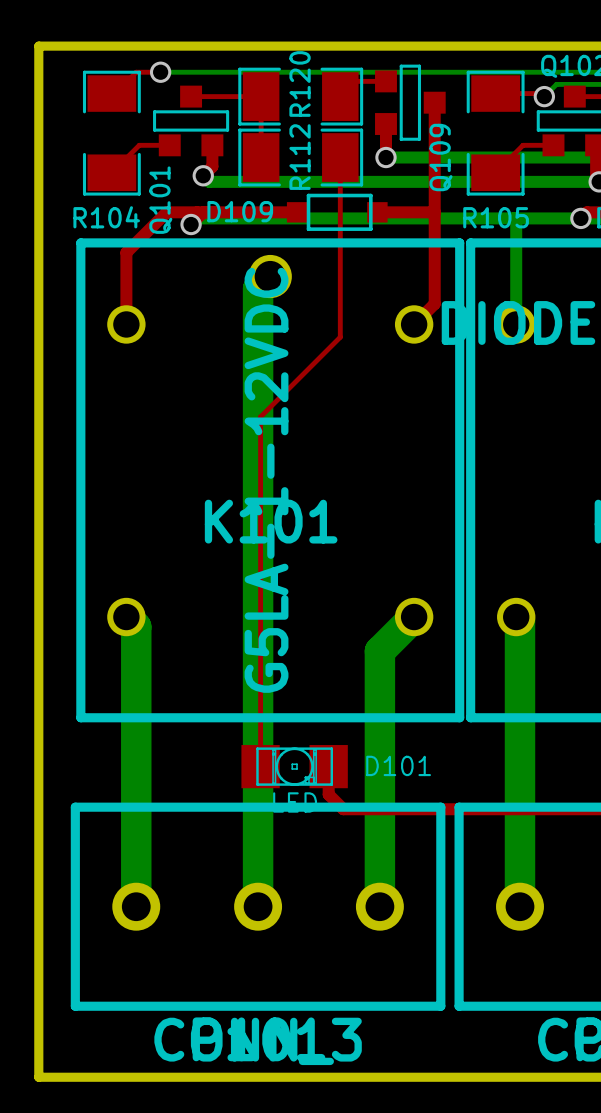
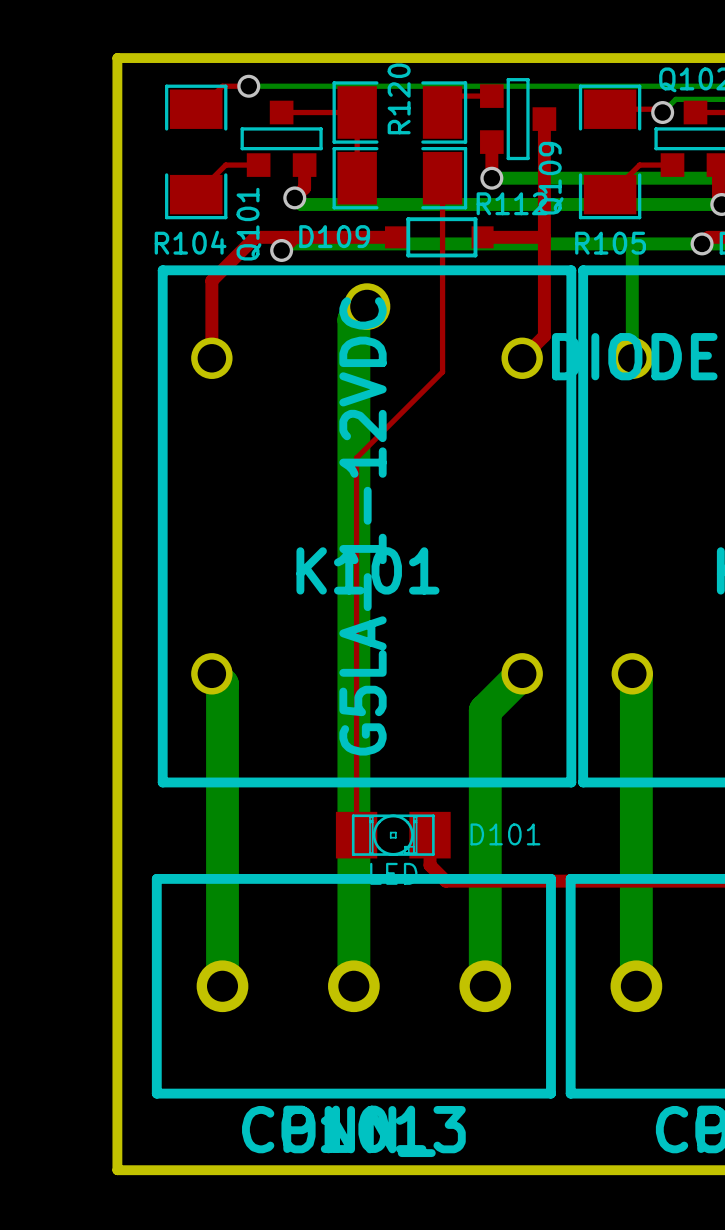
R112 name rotation: 0° (300, 157) -> 90° clockwise (512, 203)
R112 name position: R112 (300, 157) -> R112 (512, 203)

